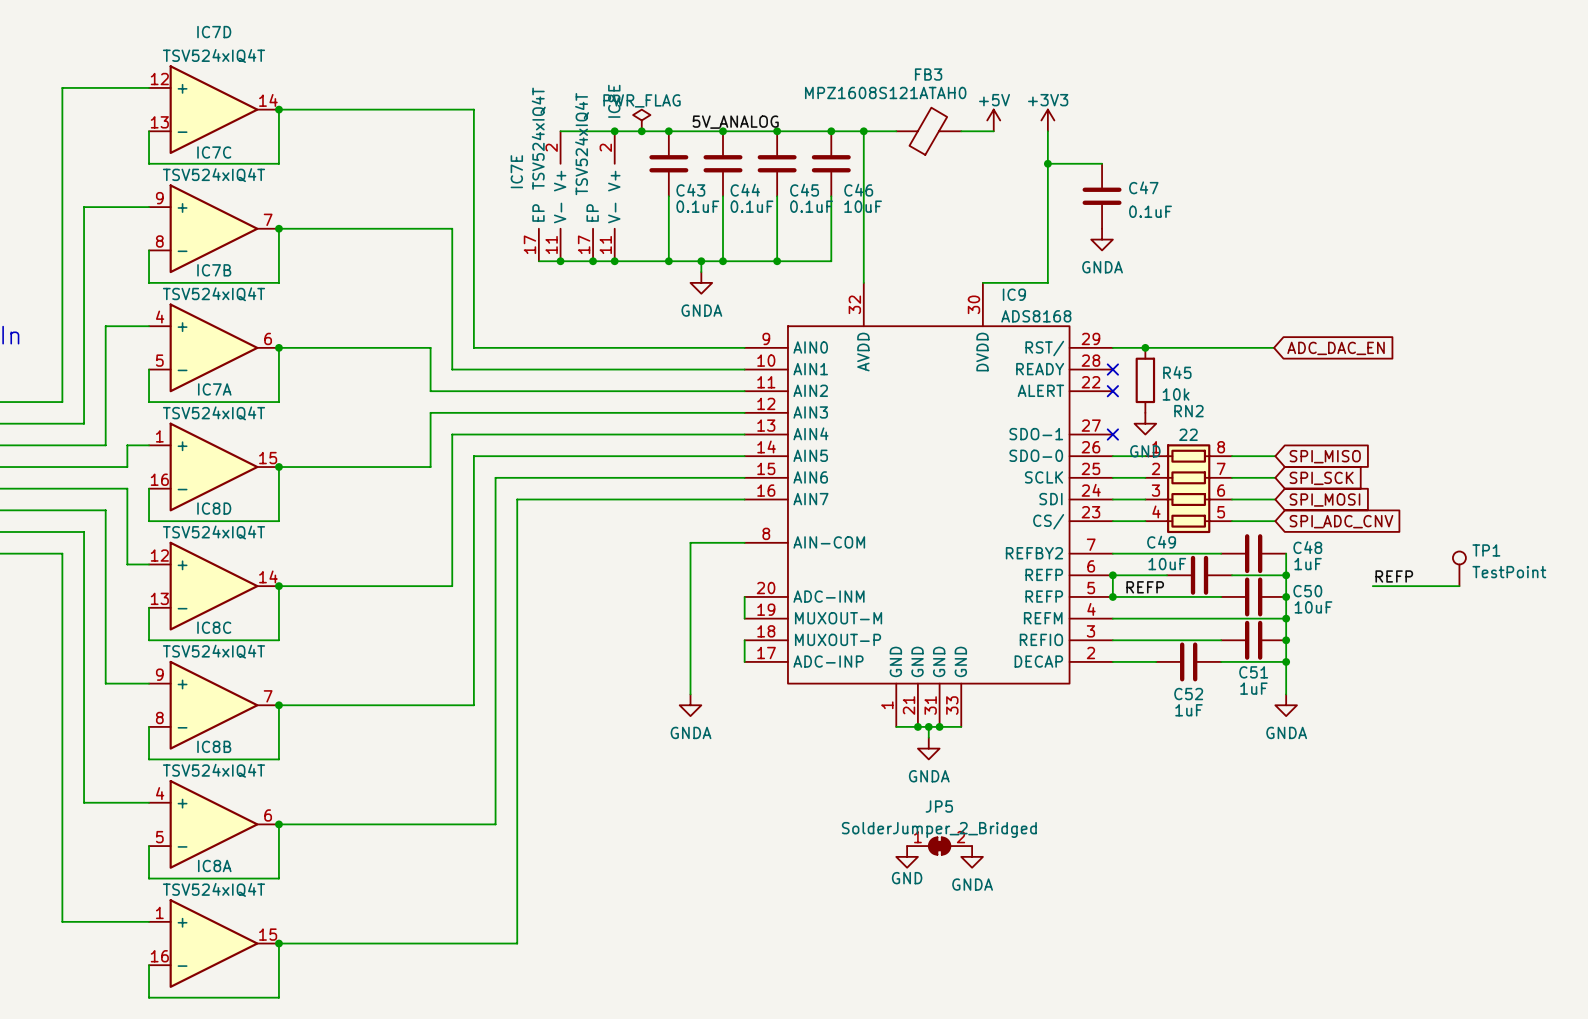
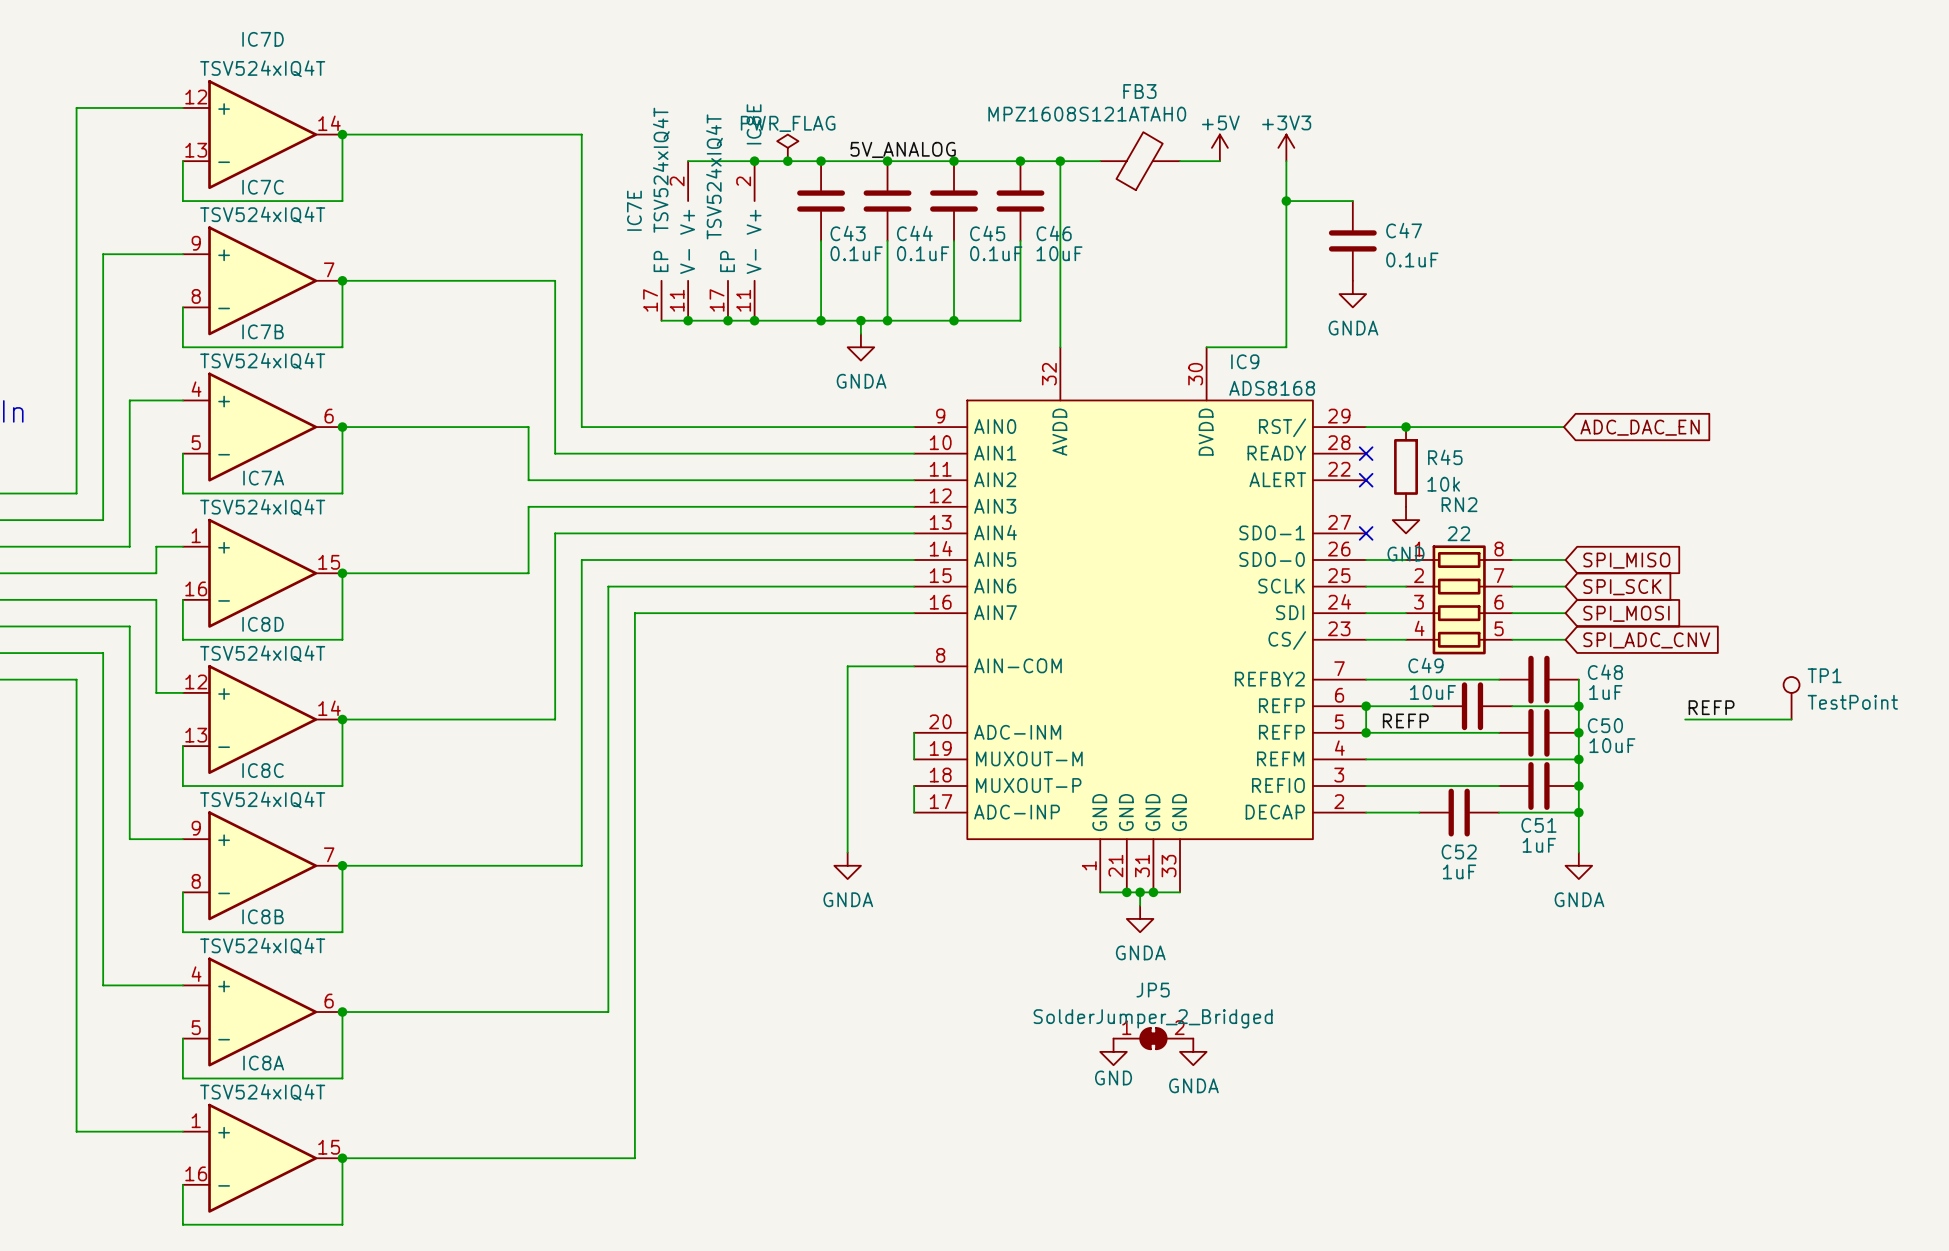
IC9 symbol: [744, 282, 1113, 727] -> [914, 347, 1367, 893]

